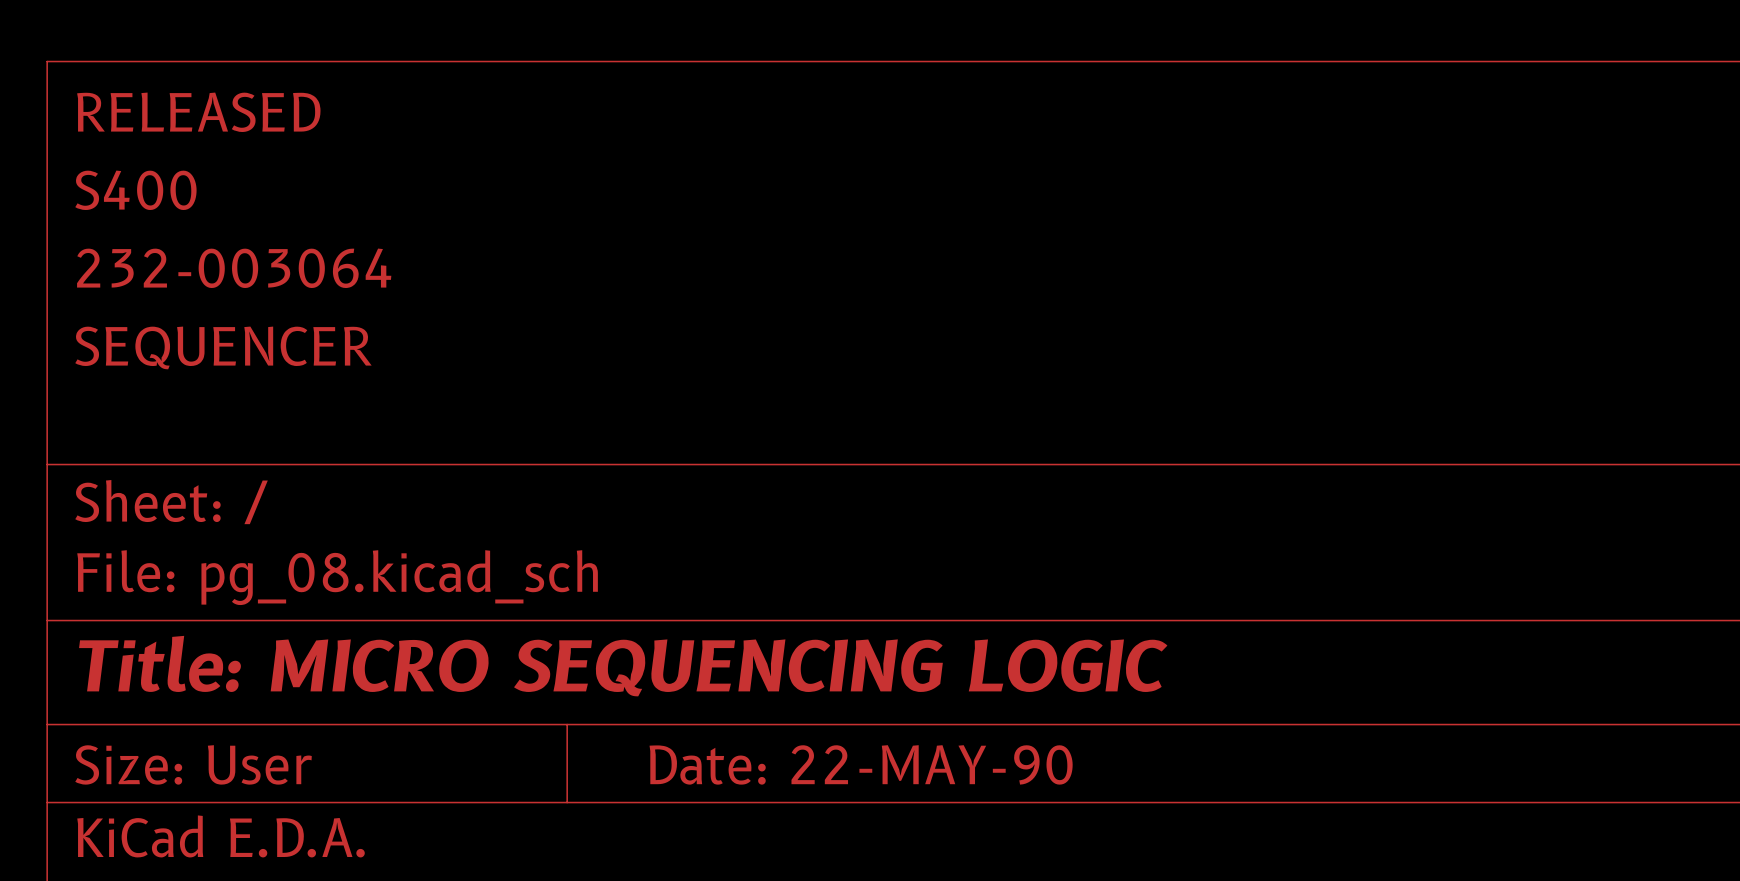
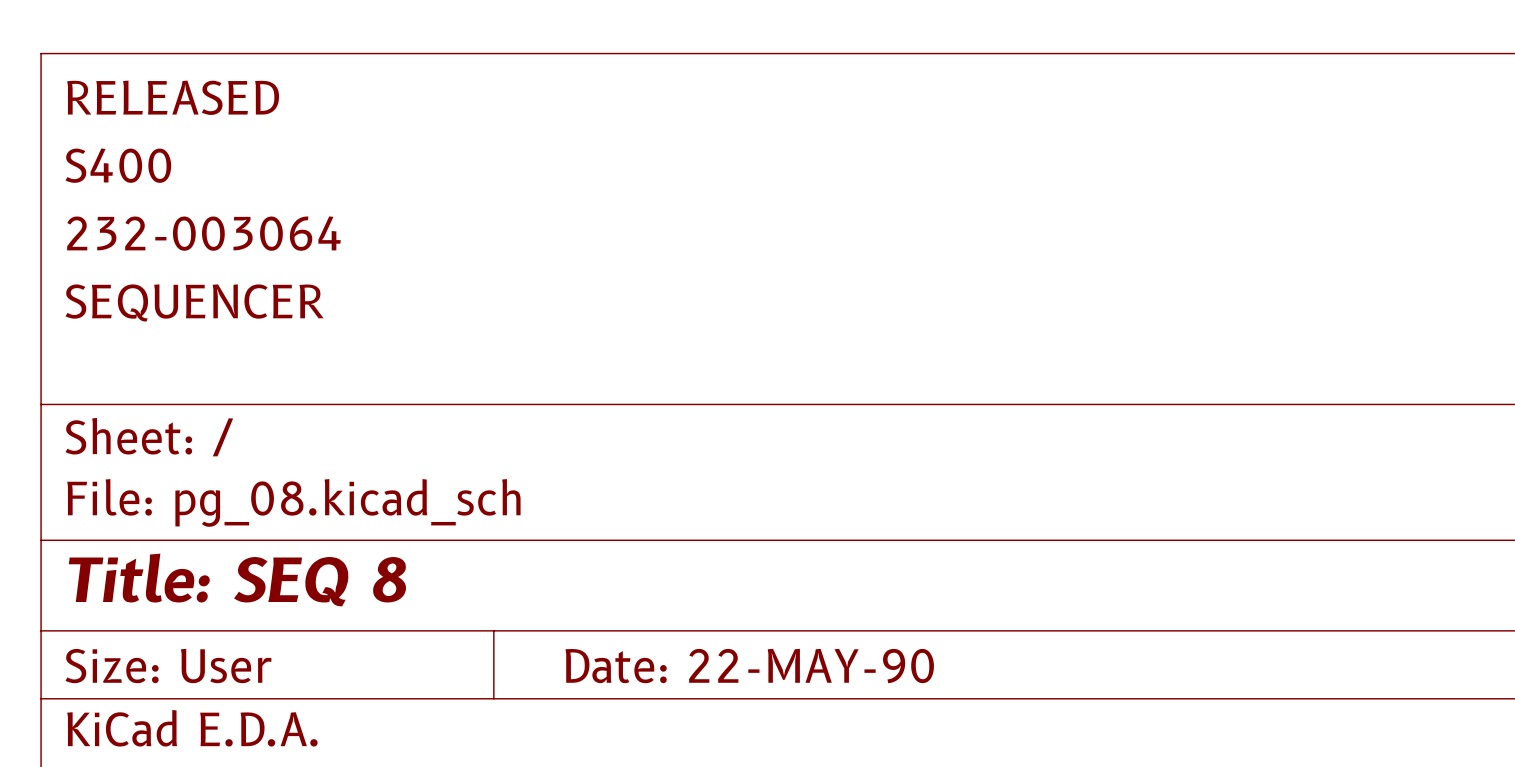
title block: Title: MICRO SEQUENCING LOGIC (623, 666) -> Title: SEQ 8 (237, 579)

